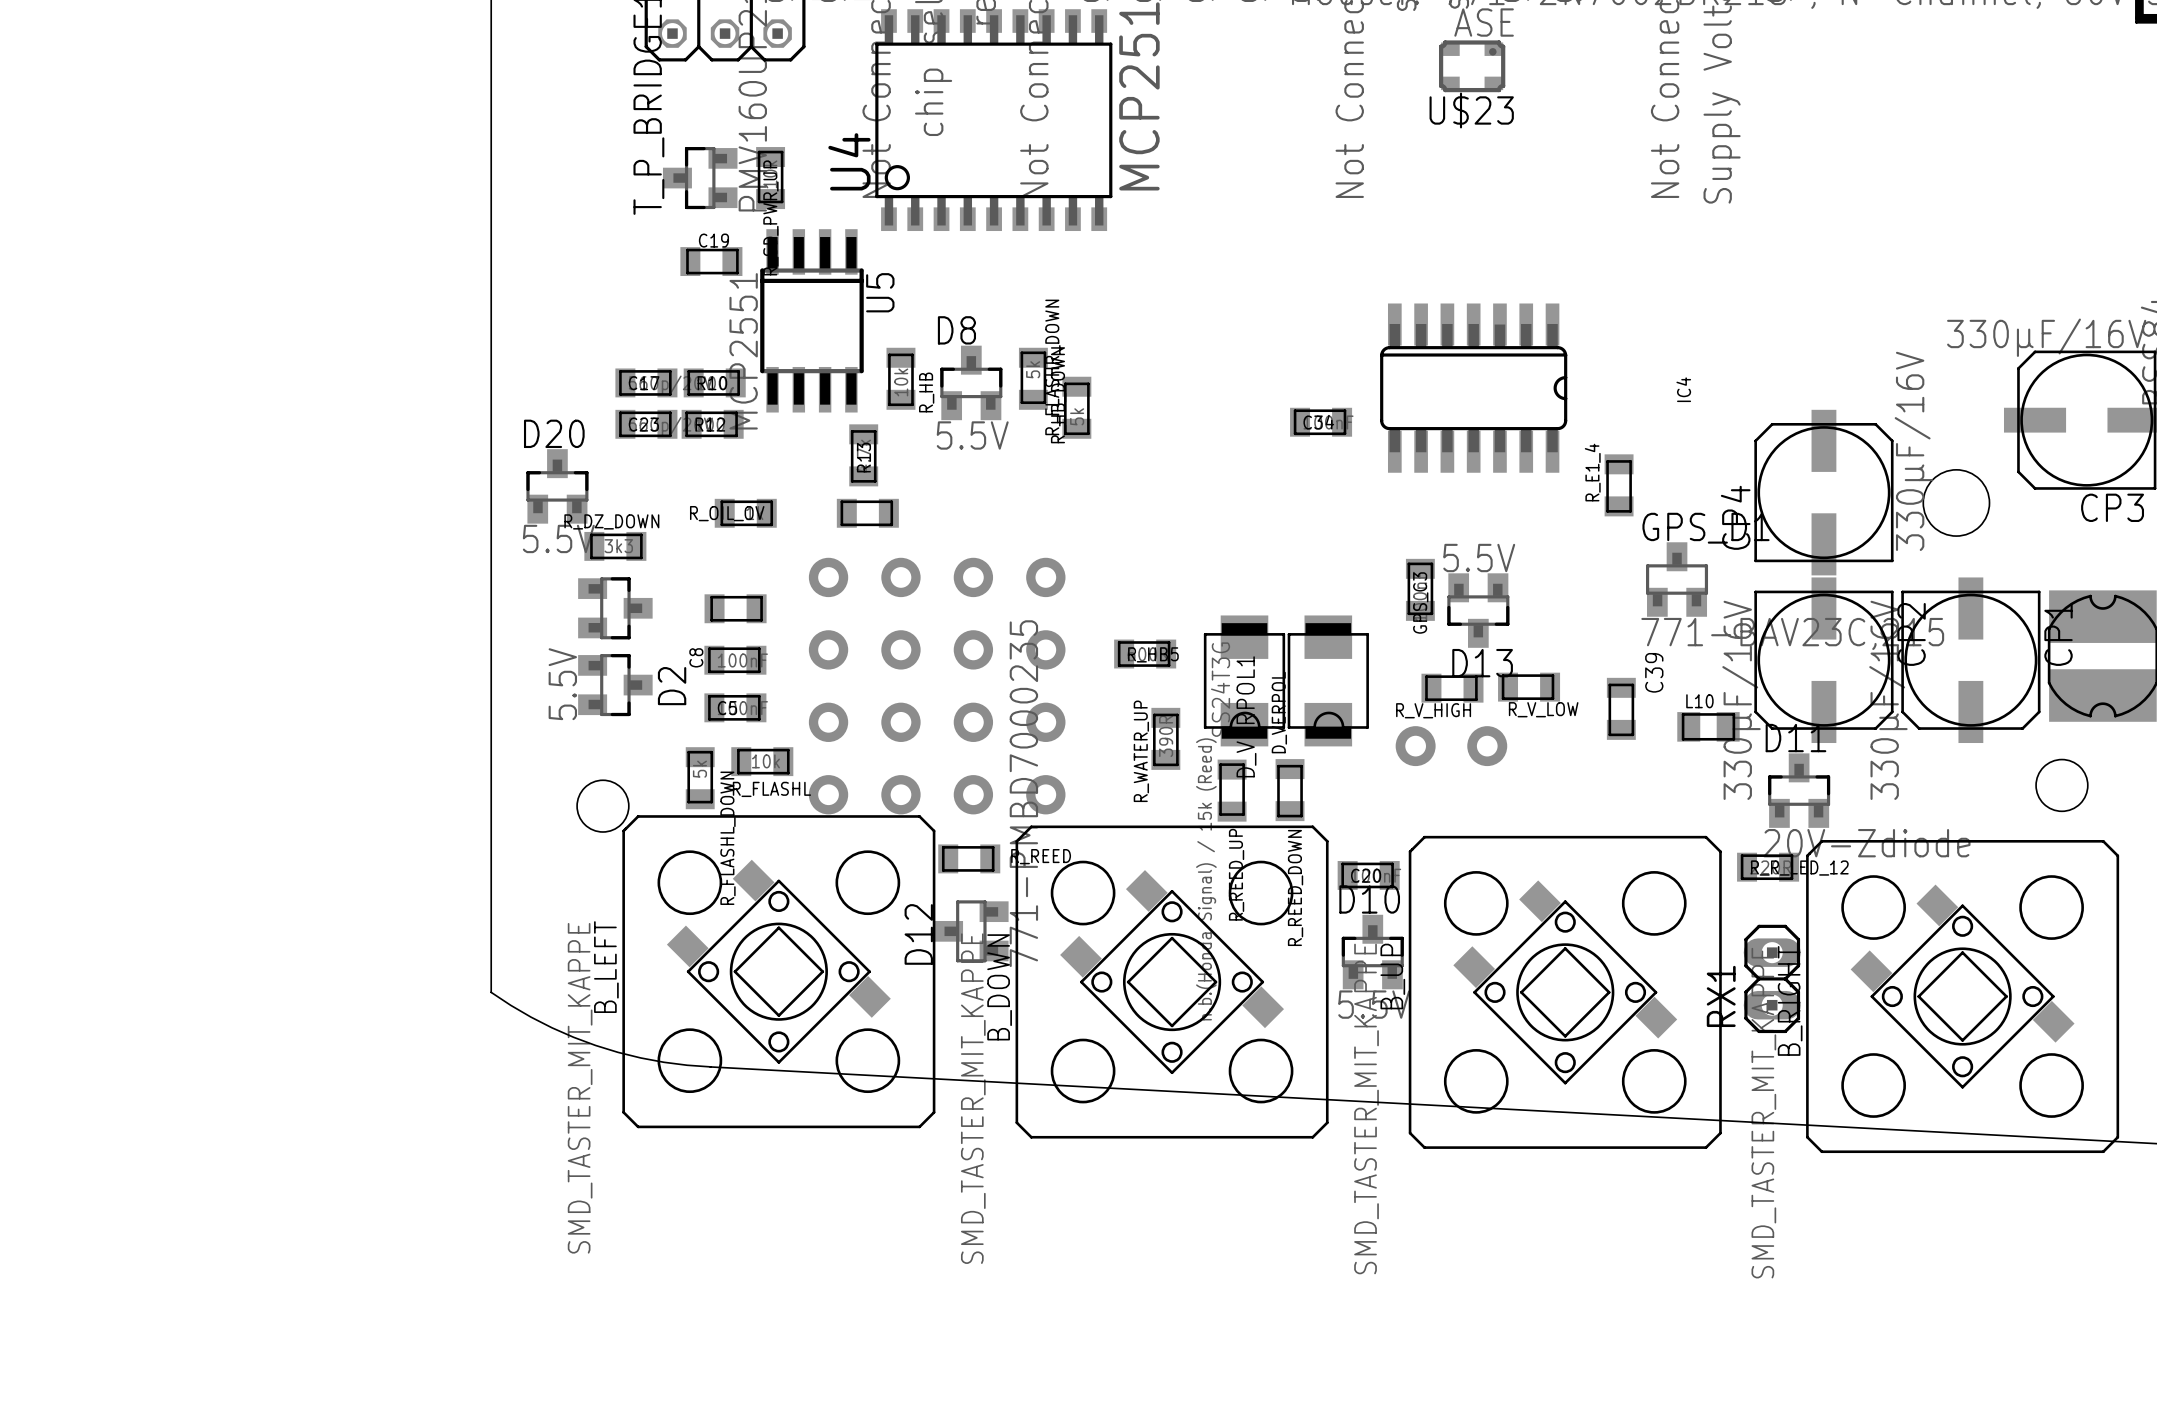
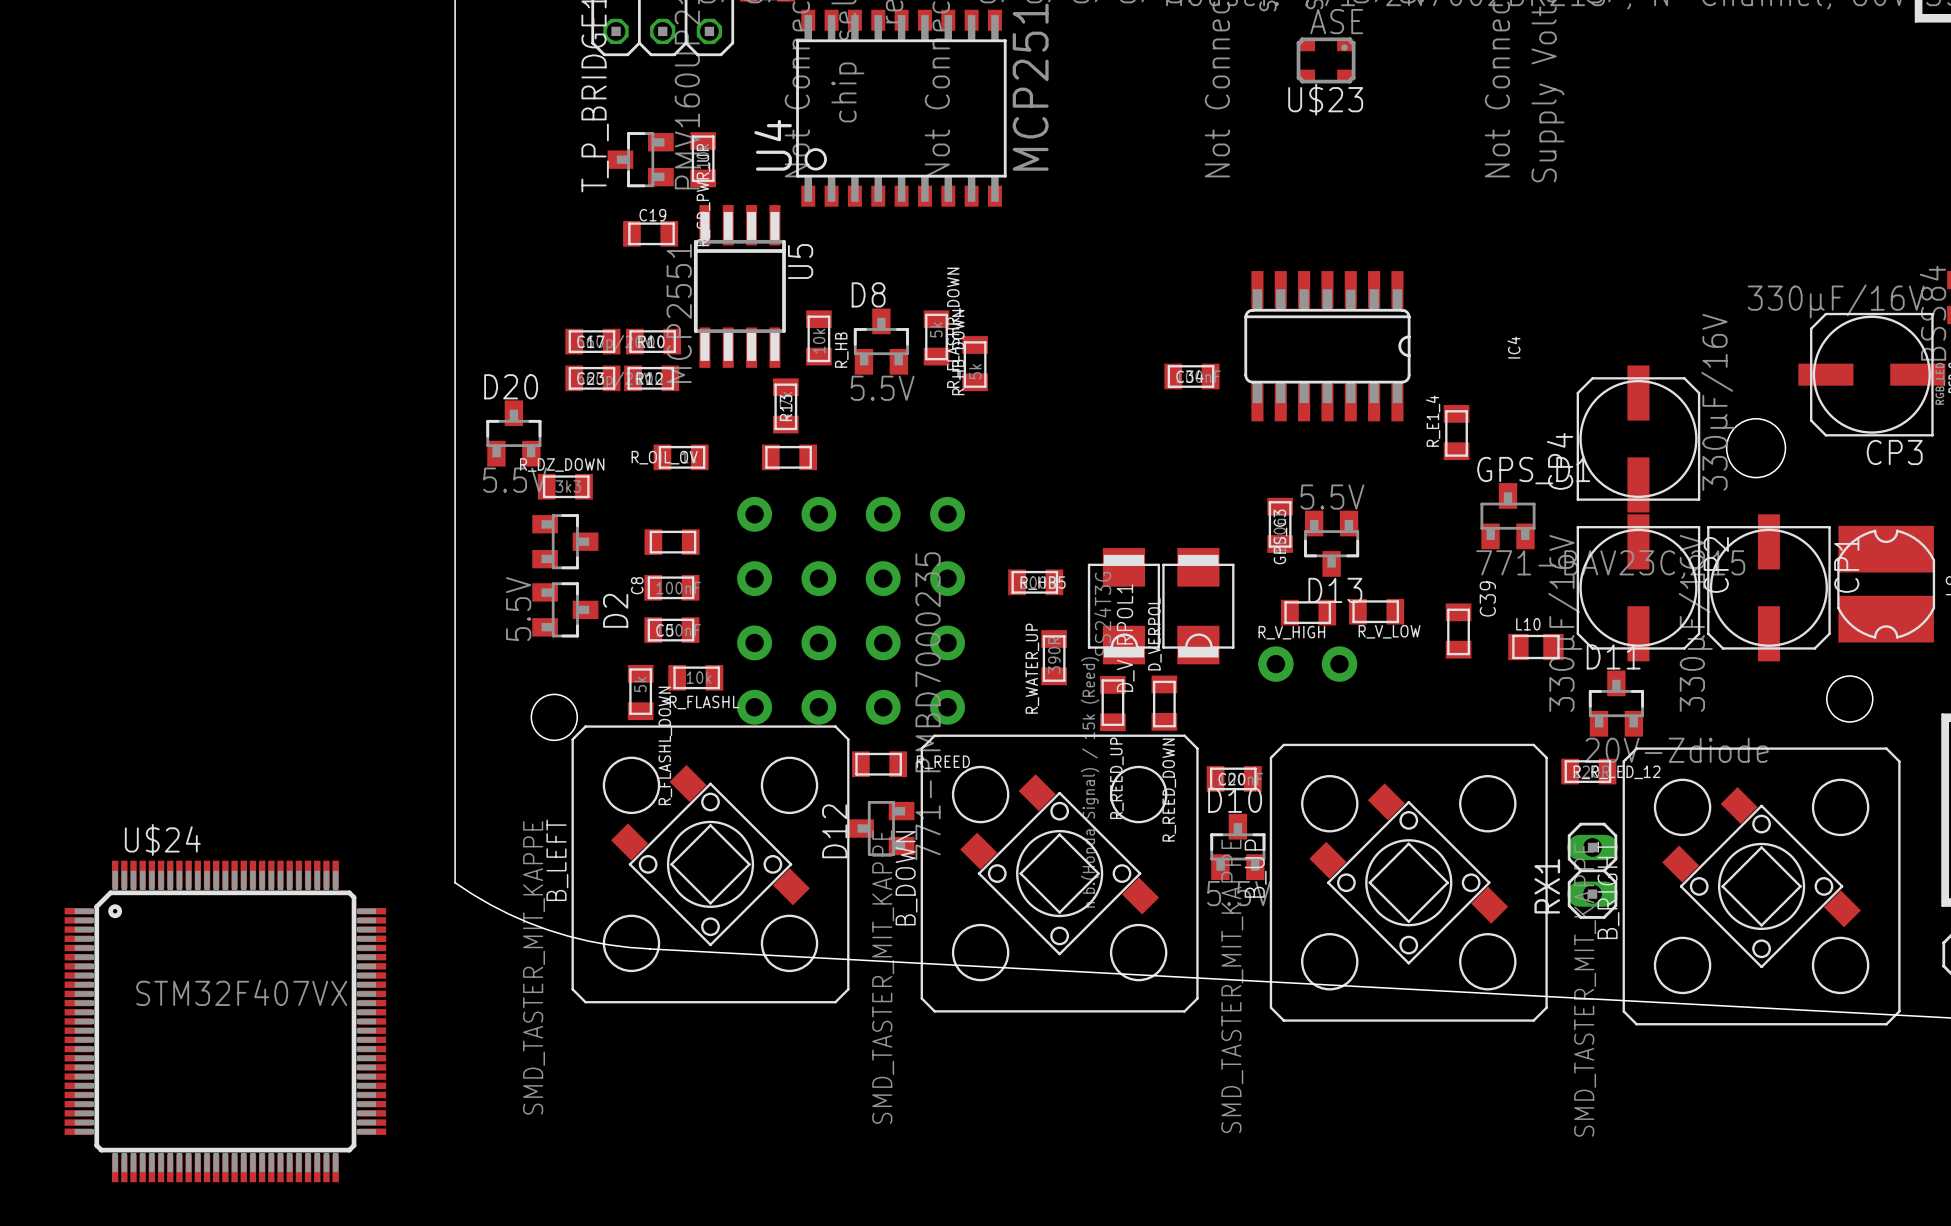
U$24: none -> STM32F407VX (225, 1021)

